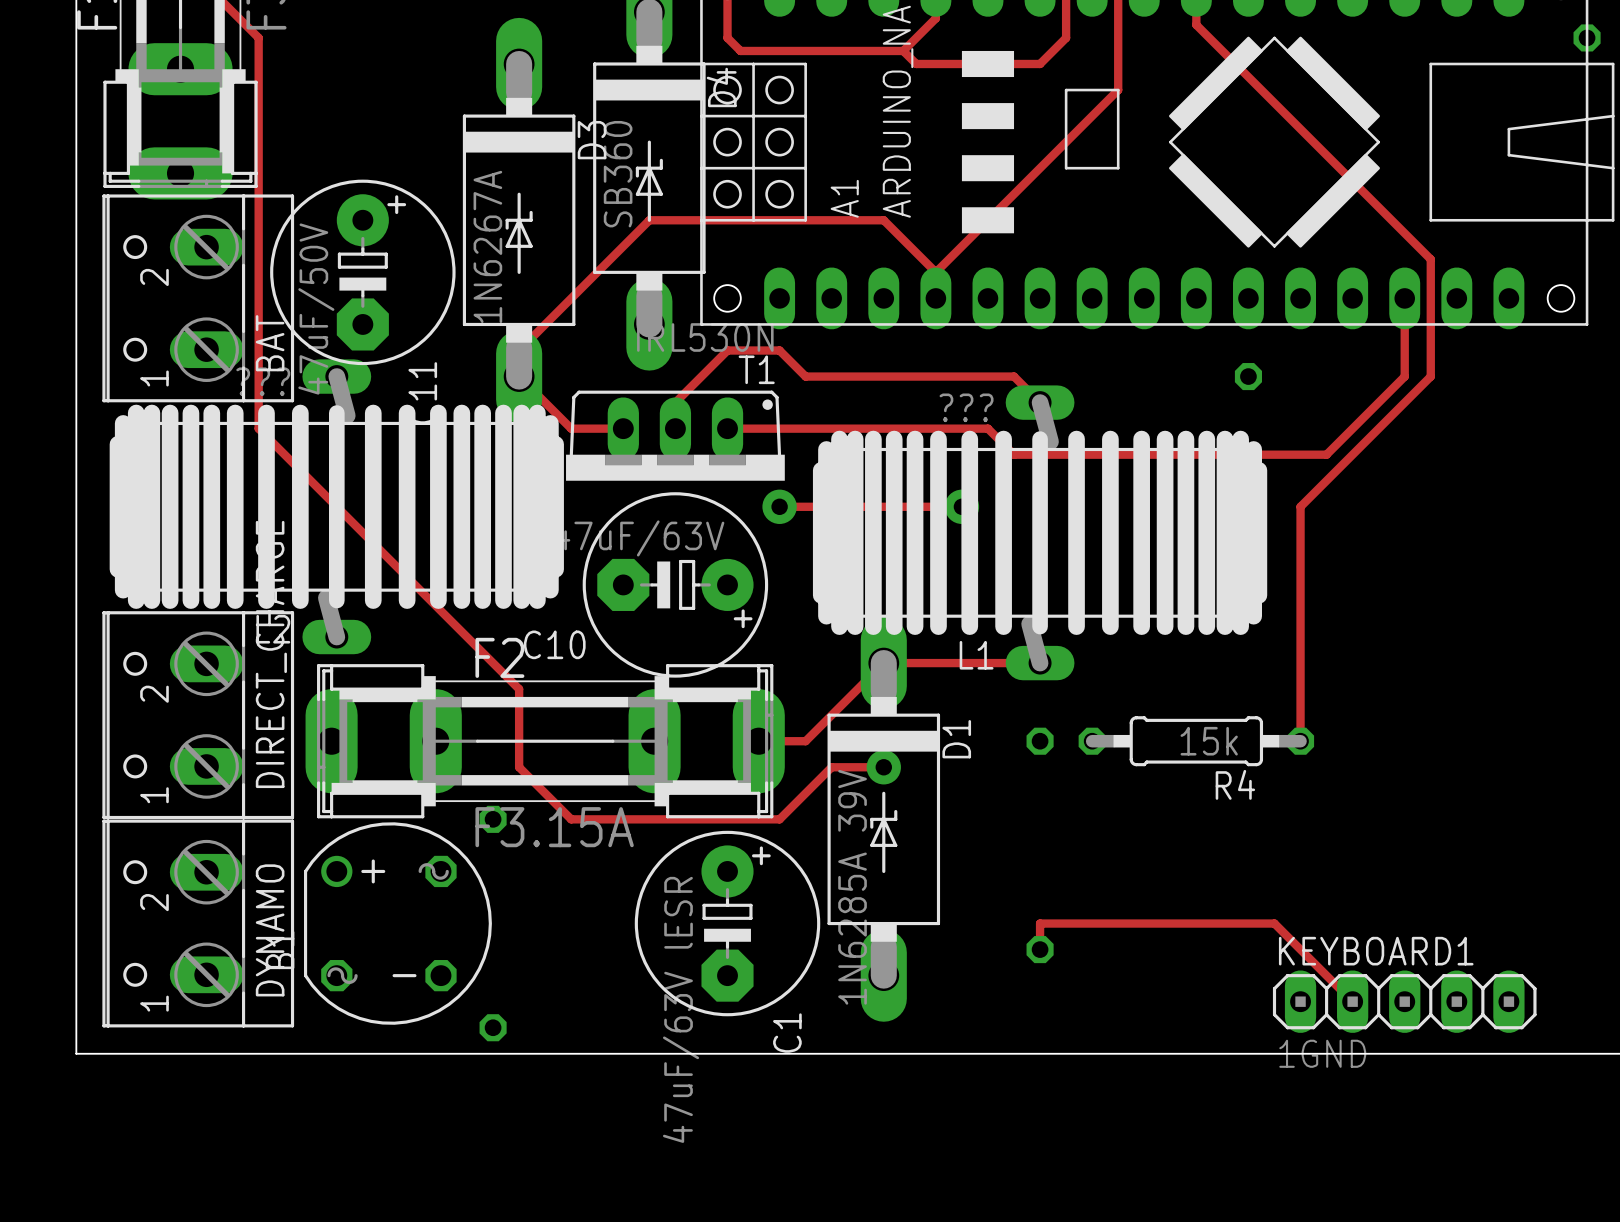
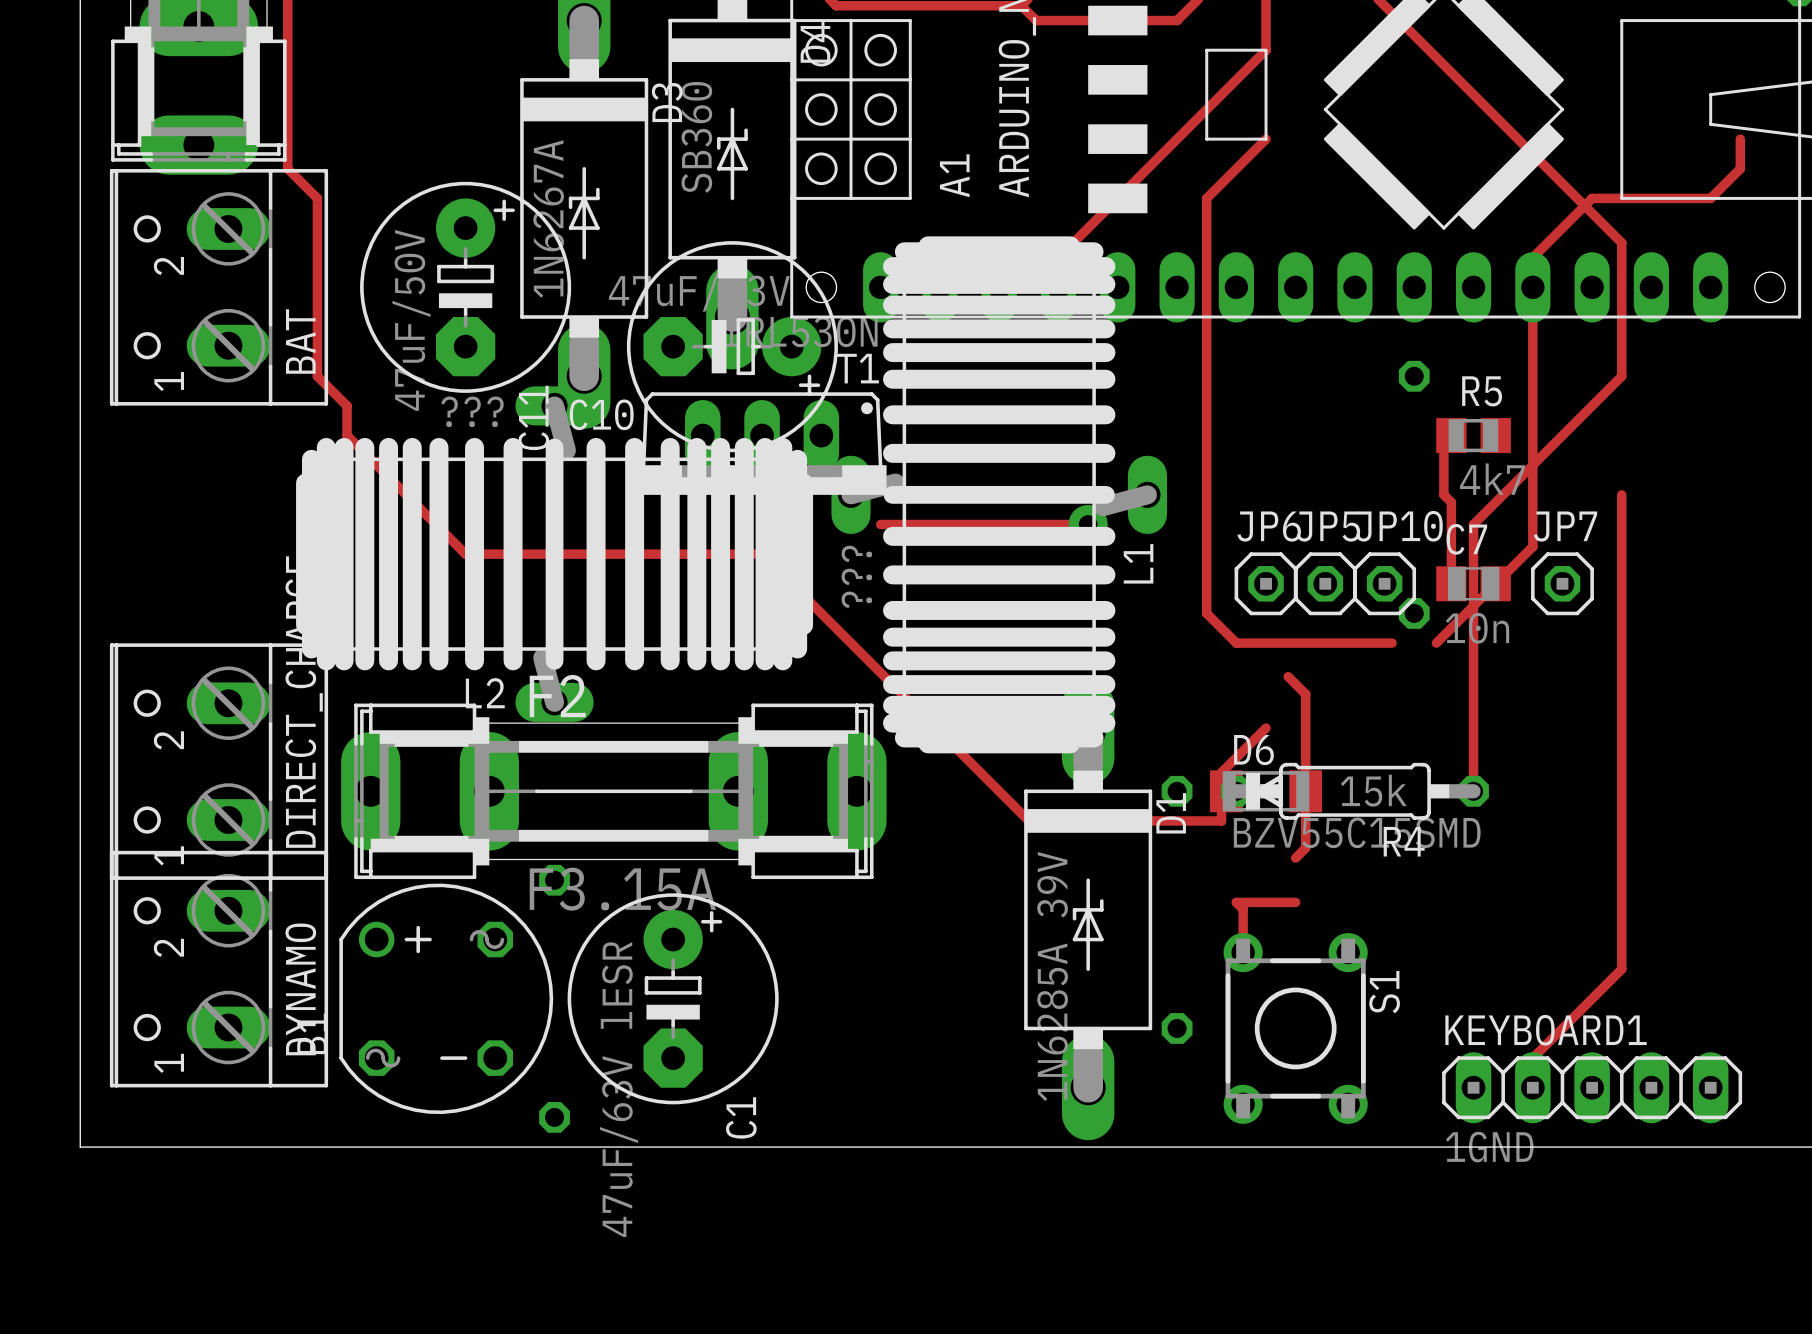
track: none -> (1266, 139) (1206, 198) (1206, 613) (1236, 643) (1392, 643)
track: none -> (1740, 139) (1740, 168) (1710, 198) (1592, 198) (1532, 257) (1532, 546) (1436, 643)
track: (258, 194) (258, 428) (519, 689) (519, 767) (571, 819) (779, 819) (831, 767) (883, 767) -> (287, 168) (317, 198) (317, 376) (347, 405) (347, 435) (465, 554) (762, 554) (1028, 820) (1221, 820) (1221, 772) (1266, 728)
C11 position: (362, 272) -> (465, 287)
track: (935, 298) (935, 272) (883, 220) (649, 220) (519, 350) (519, 376) (571, 428) (623, 428) -> none
track: (1404, 298) (1404, 376) (1326, 454) (1014, 454) (987, 428) (727, 428) -> none
track: (1040, 402) (1014, 376) (805, 376) (779, 350) (727, 350) (675, 402) (675, 428) -> none
L1 value position: ??? (966, 407) -> ??? (856, 576)
track: none -> (1451, 435) (1443, 443) (1443, 494) (1451, 502) (1451, 583)
R5: none -> 4k7 (1473, 435)
L2 position: (336, 506) -> (554, 554)
via: (779, 506) -> none
L1 rotation: 0° (1040, 532) -> 90° clockwise (999, 494)
JP6: none -> (1266, 583)
JP5: none -> (1325, 583)
JP10: none -> (1384, 583)
C7: none -> 10n (1473, 583)
JP7: none -> (1562, 583)
C10 position: (675, 584) -> (732, 346)
track: none -> (1288, 676) (1305, 694) (1305, 848) (1295, 858)
L1 name position: L1 (976, 655) -> L1 (1138, 563)
track: (1040, 663) (883, 663) (805, 741) (758, 741) -> none
D6: none -> BZV55C15SMD (1266, 791)
via: (883, 767) -> none
D1 position: (883, 819) -> (1088, 909)
track: none -> (1295, 902) (1236, 902) (1243, 909) (1243, 952)
DYNAMO position: (198, 923) -> (218, 969)
C1 position: (727, 923) -> (673, 998)
track: (1040, 949) (1040, 923) (1274, 923) (1352, 1001) -> (1621, 494) (1621, 969) (1532, 1058) (1532, 1087)
S1: none -> (1295, 1028)

